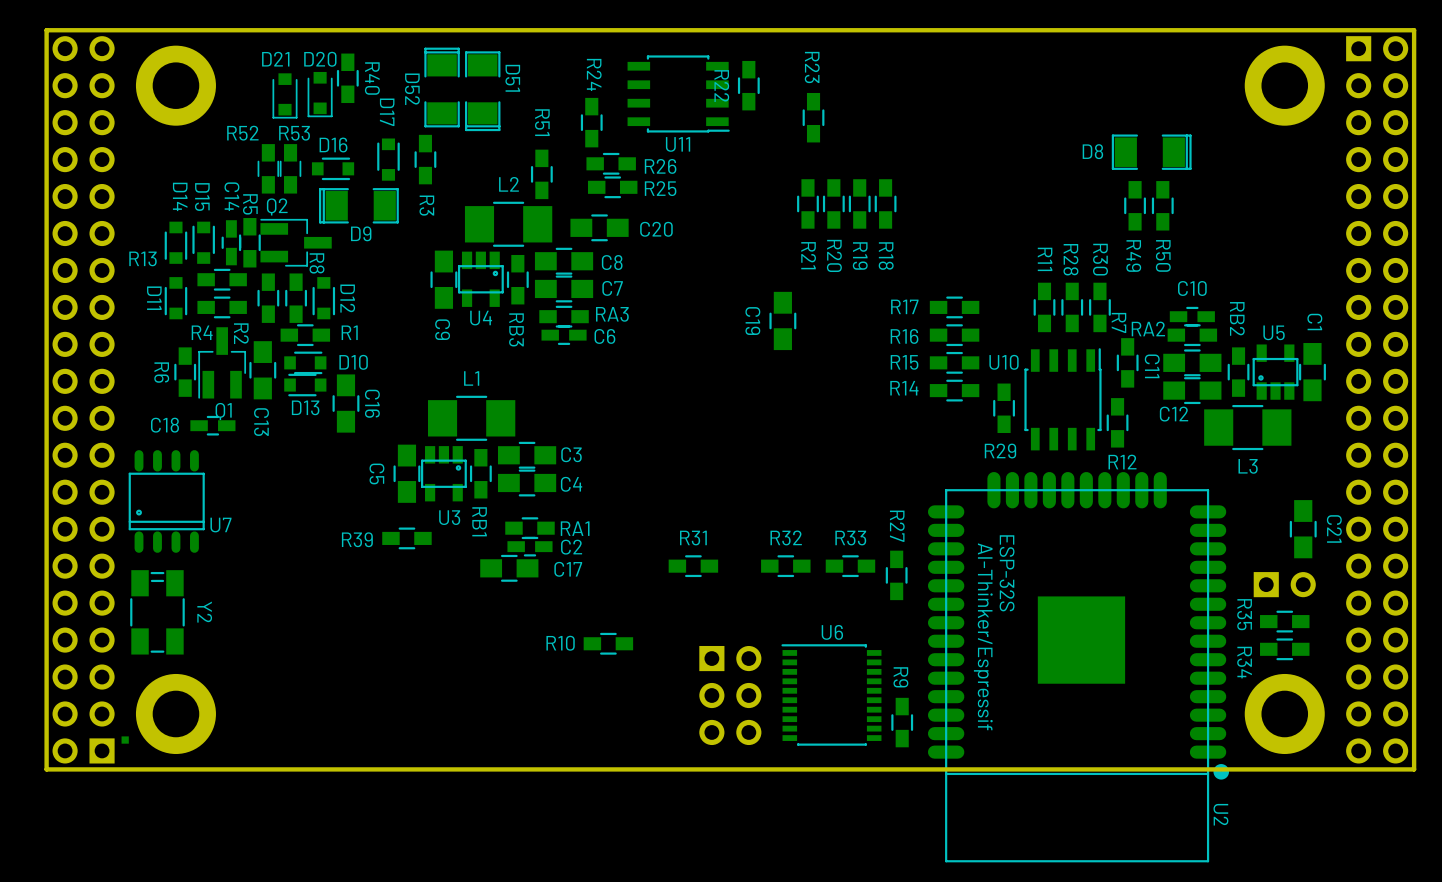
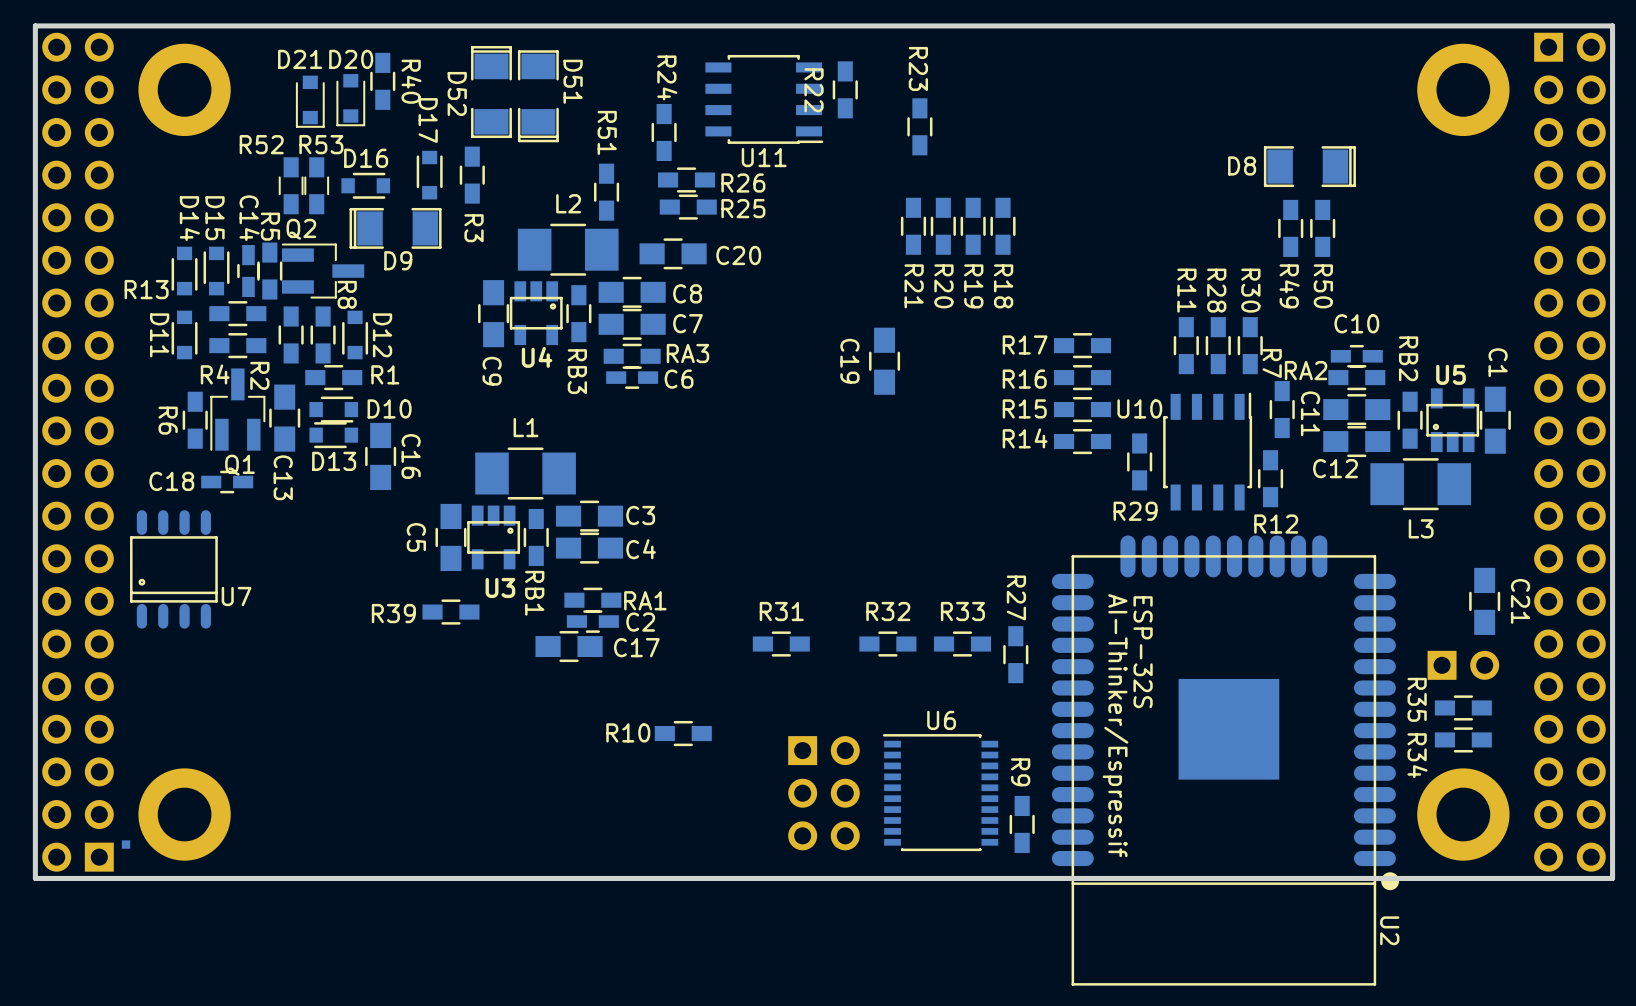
Y2: (157, 612) -> none

